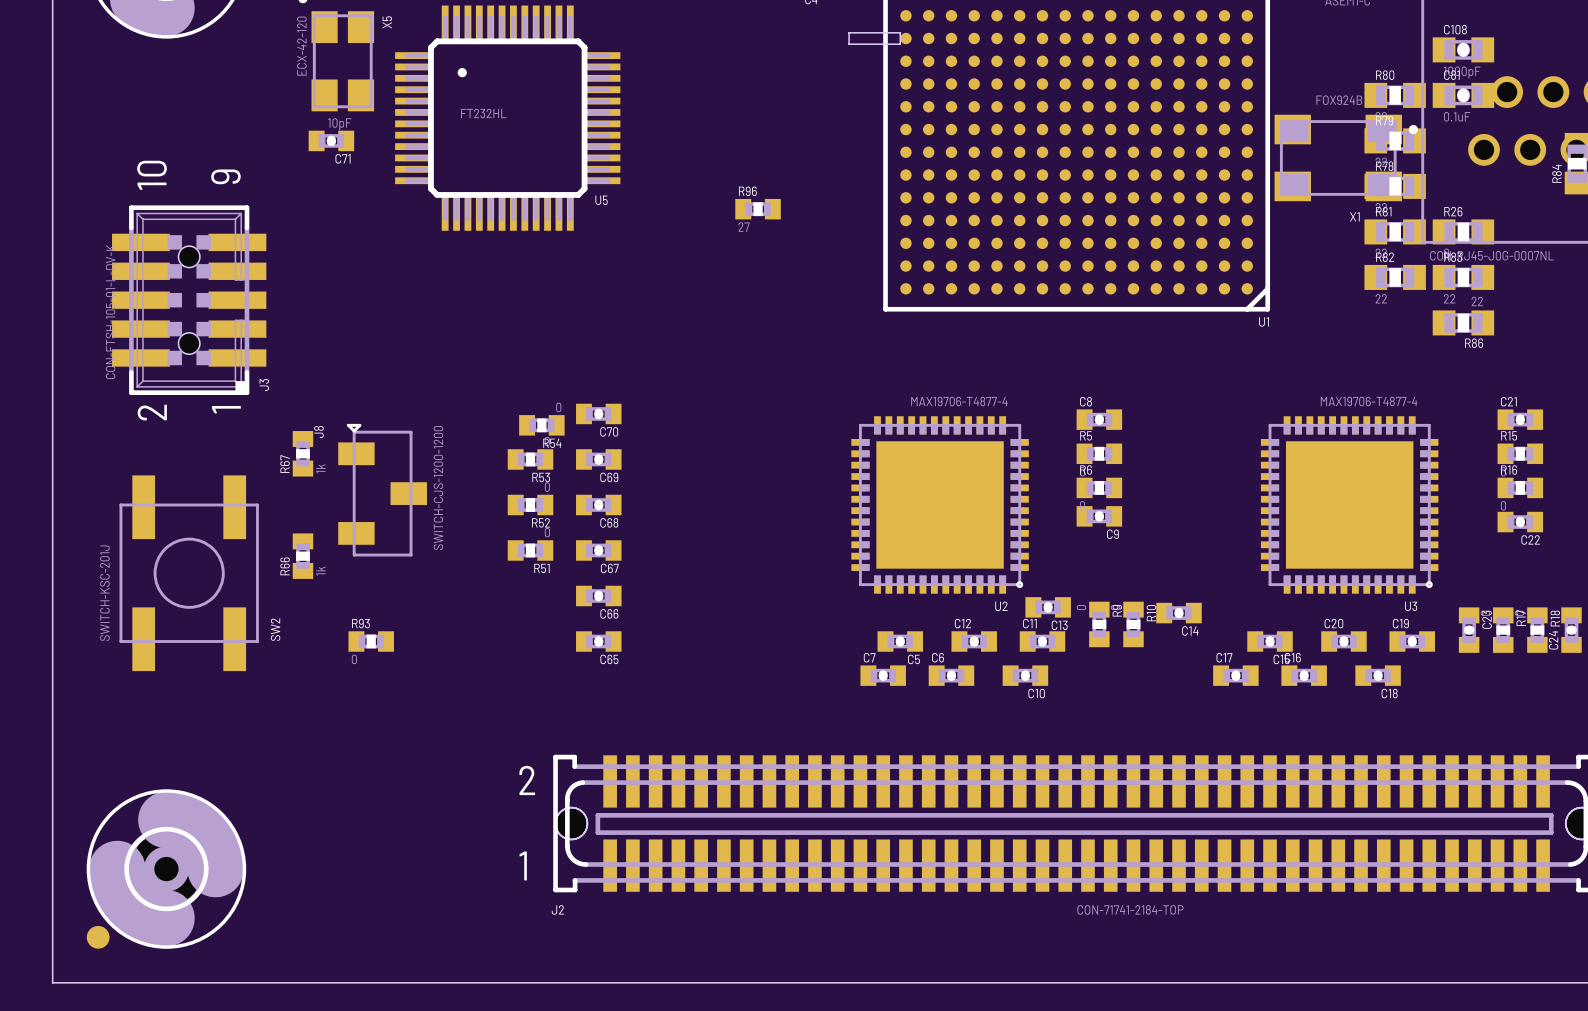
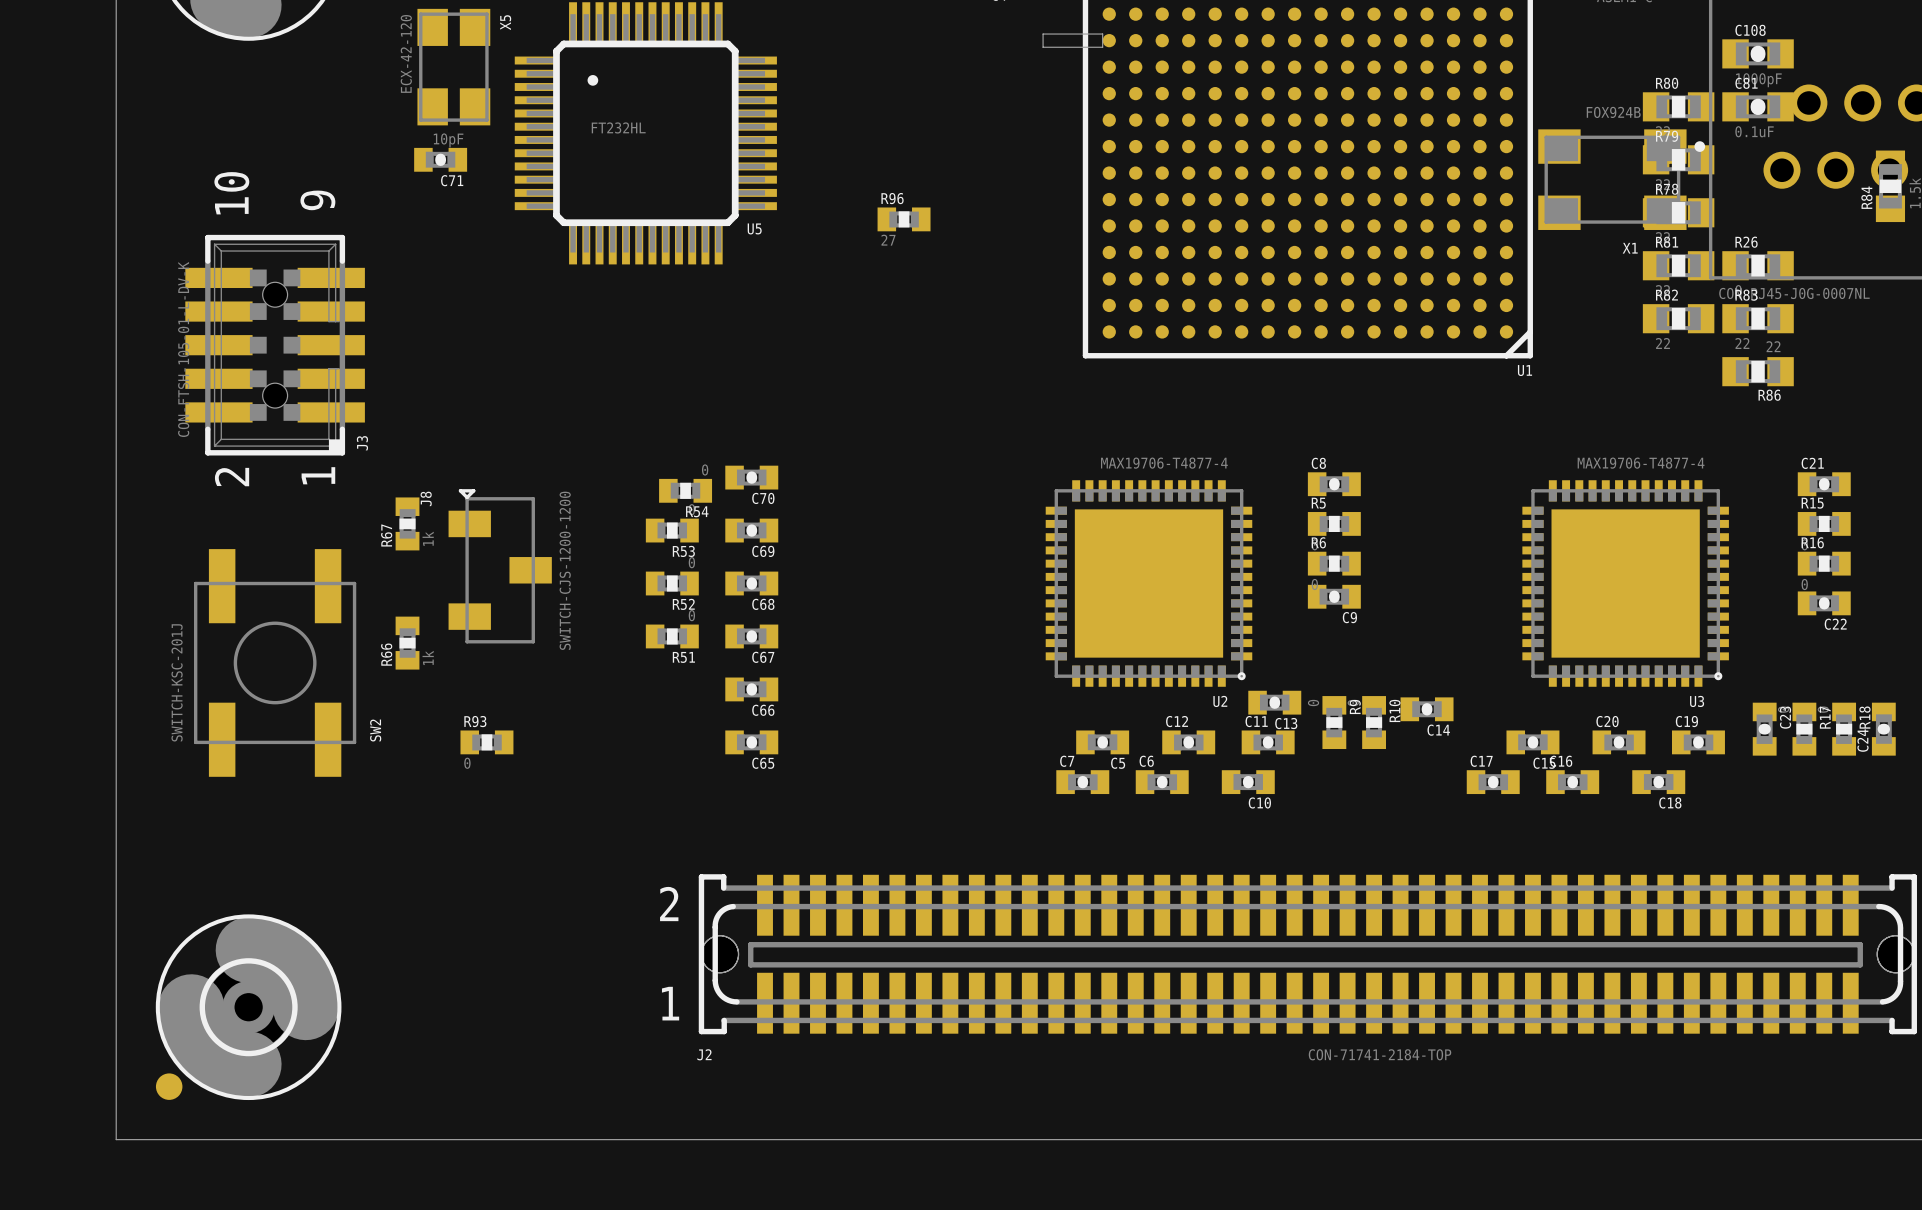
R96 position: (758, 209) -> (904, 219)

